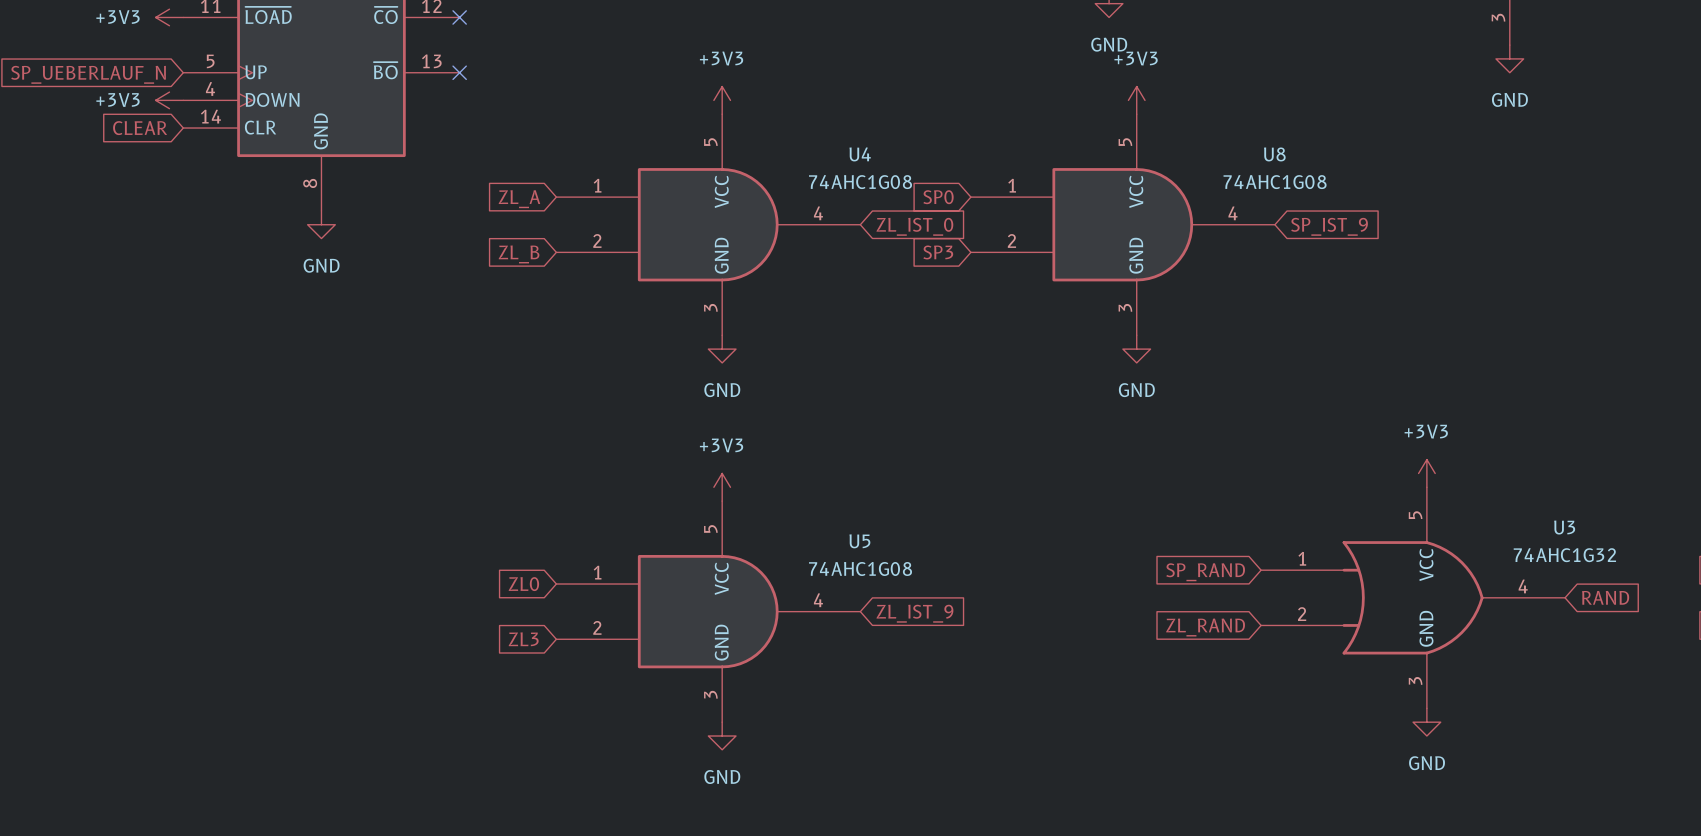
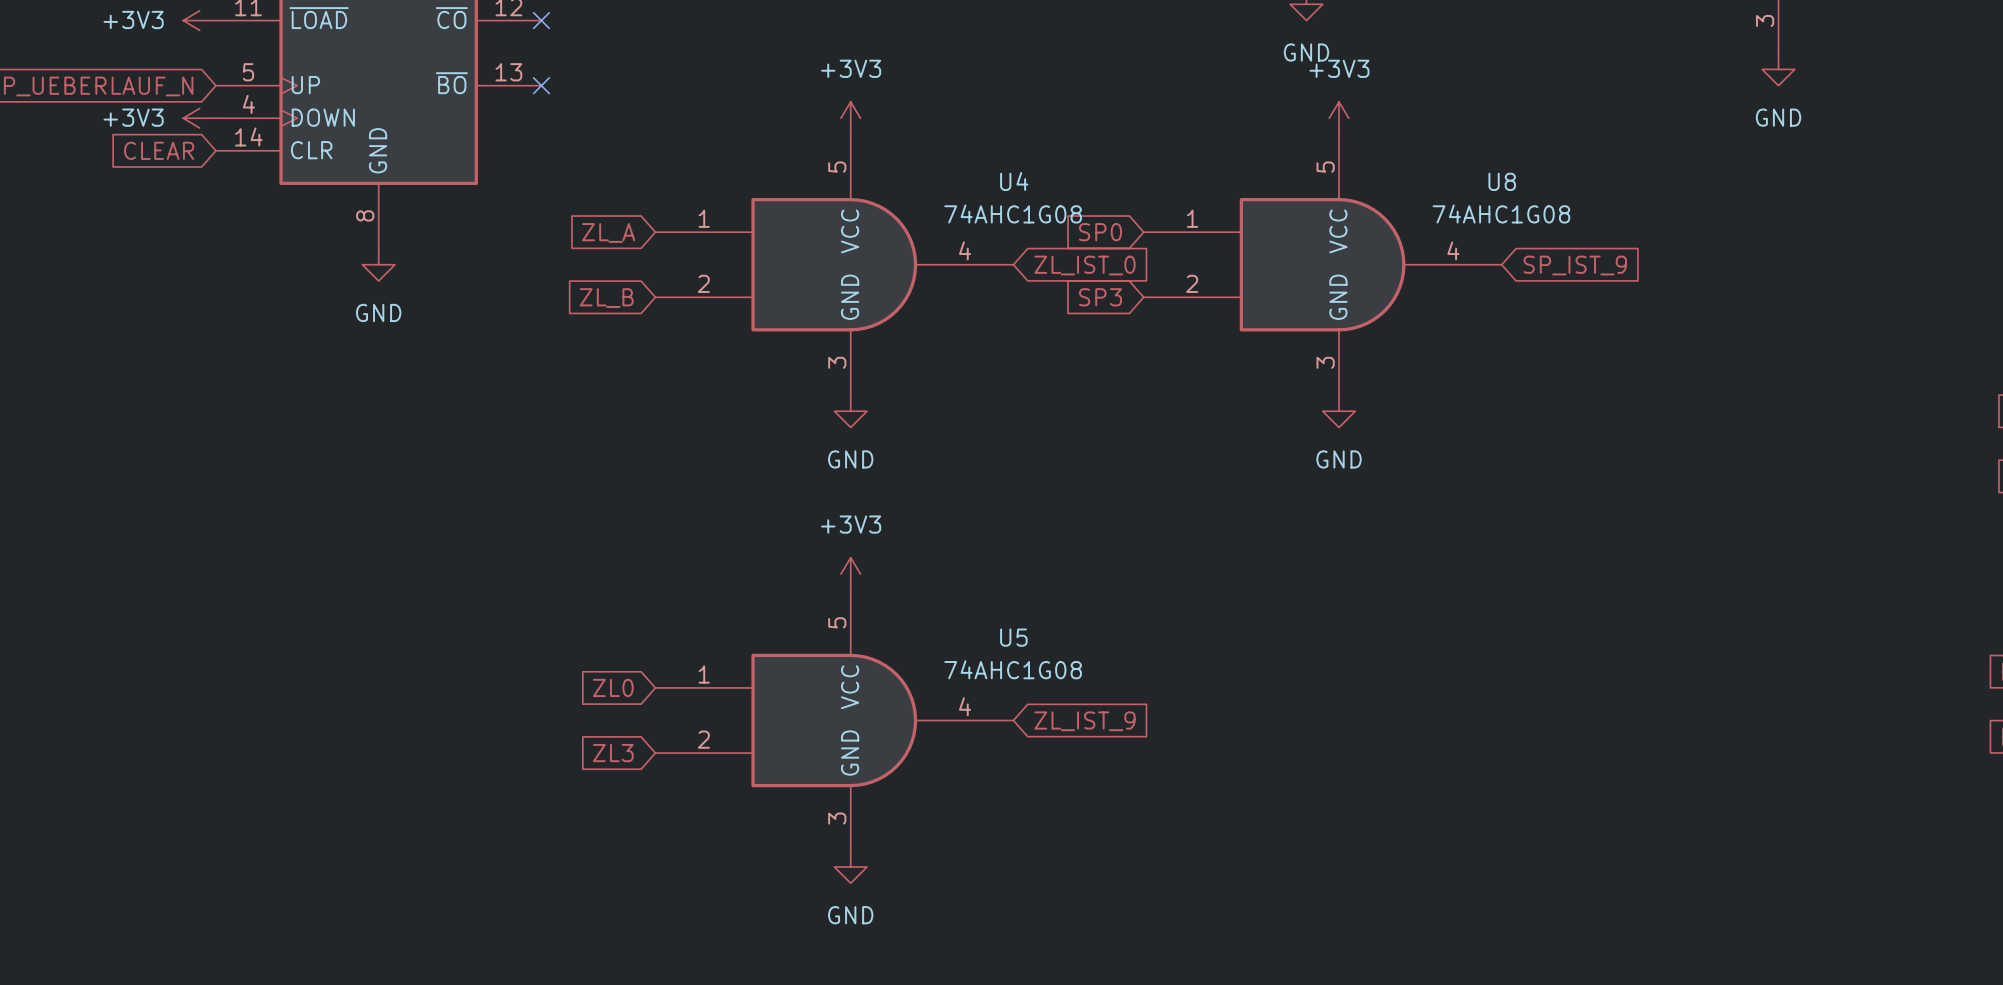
power symbol: +3V3 (1426, 473) -> none
global label: SP_RAND (1205, 572) -> none
U3: 74AHC1G32 (1413, 597) -> none
global label: RAND (1605, 597) -> none
global label: ZL_RAND (1205, 627) -> none
power symbol: GND (1426, 722) -> none

